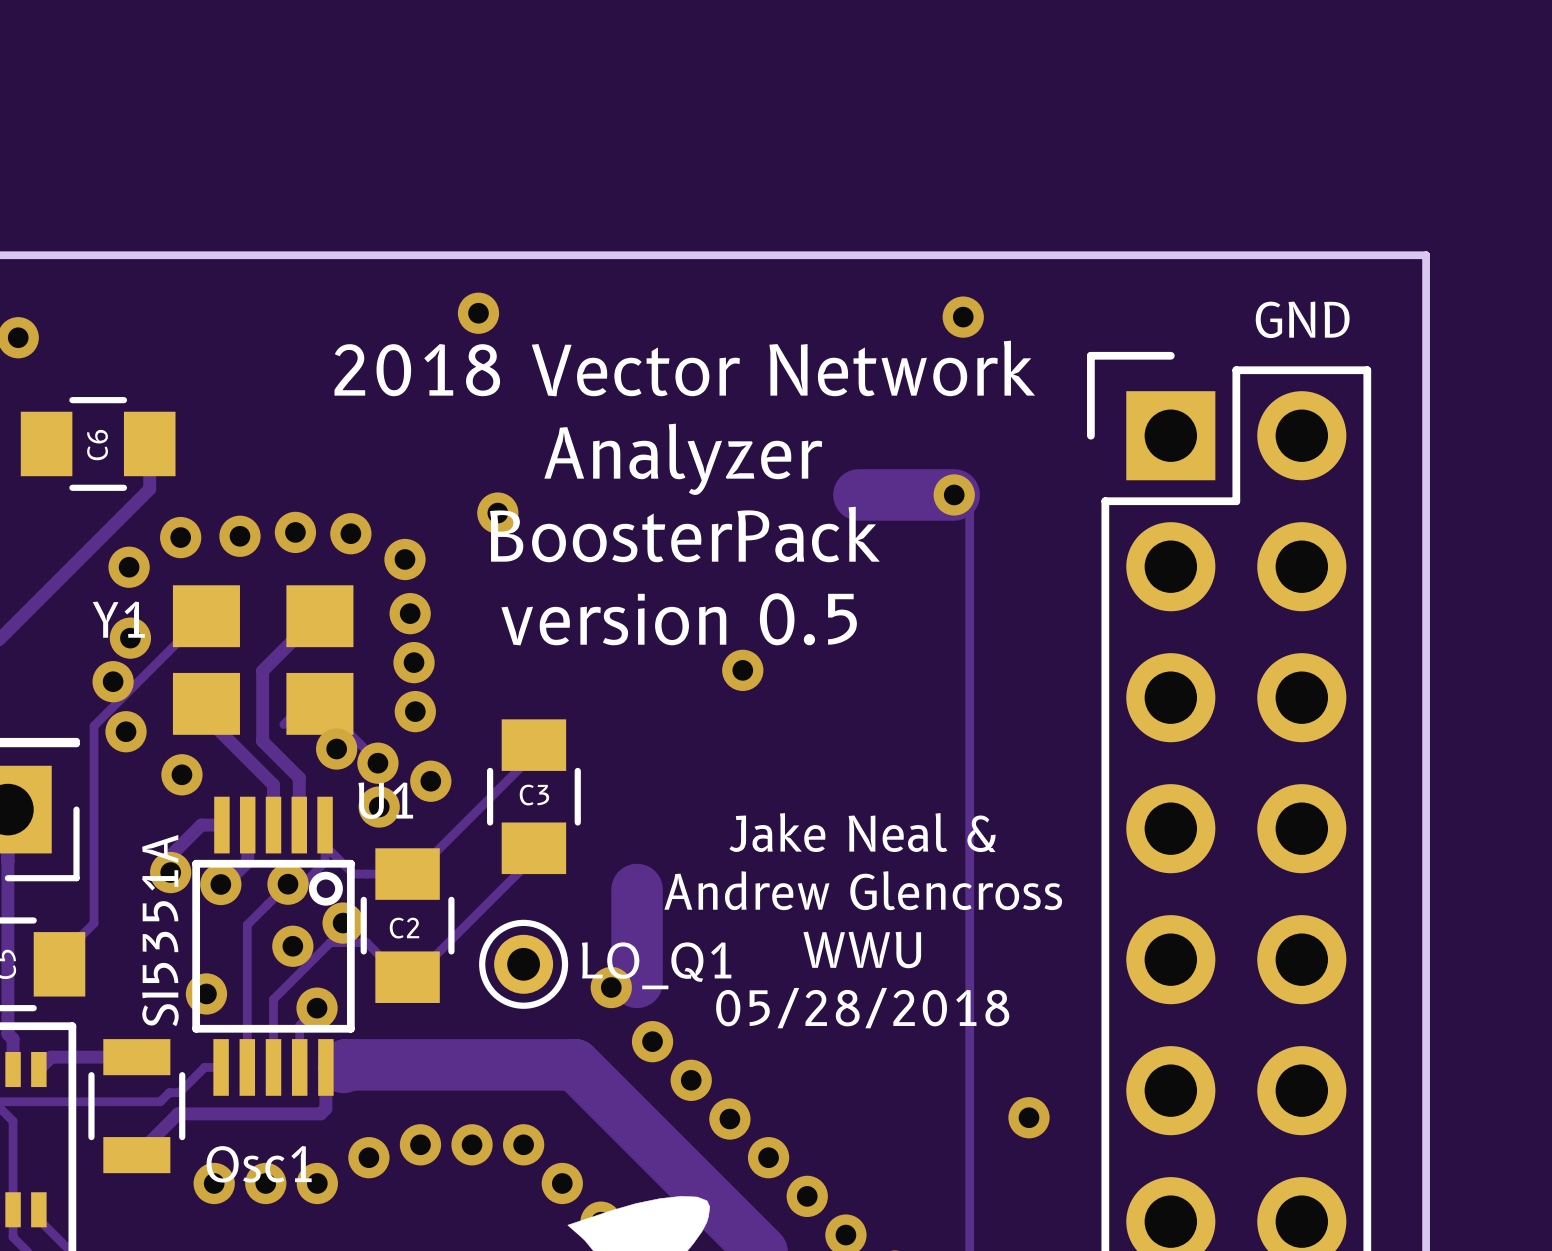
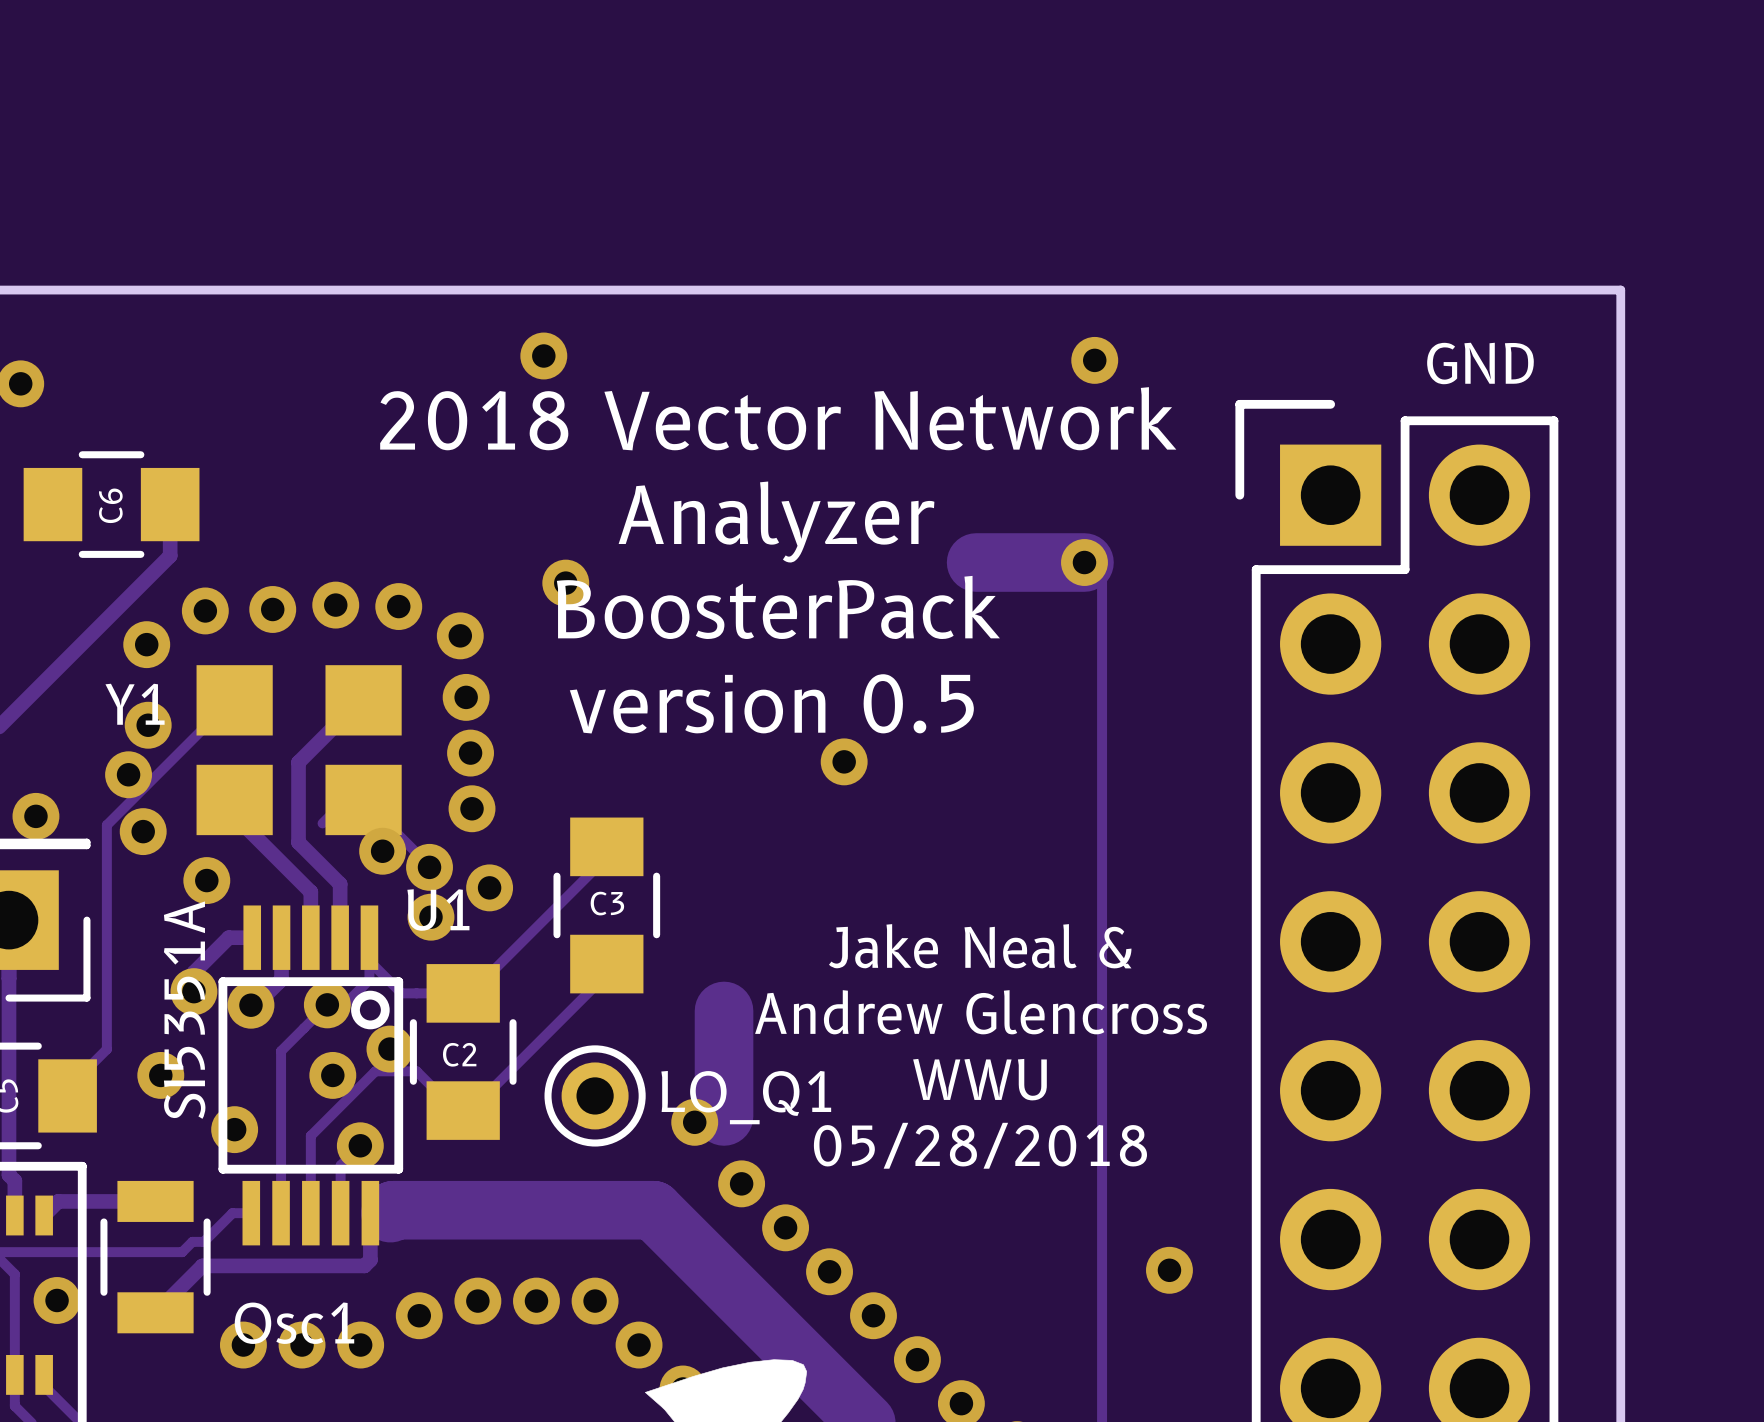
via: none -> (35, 816)
U1 value position: SI5351A (160, 930) -> SI5351A (184, 1010)
via: none -> (160, 1075)
via: none -> (57, 1300)

